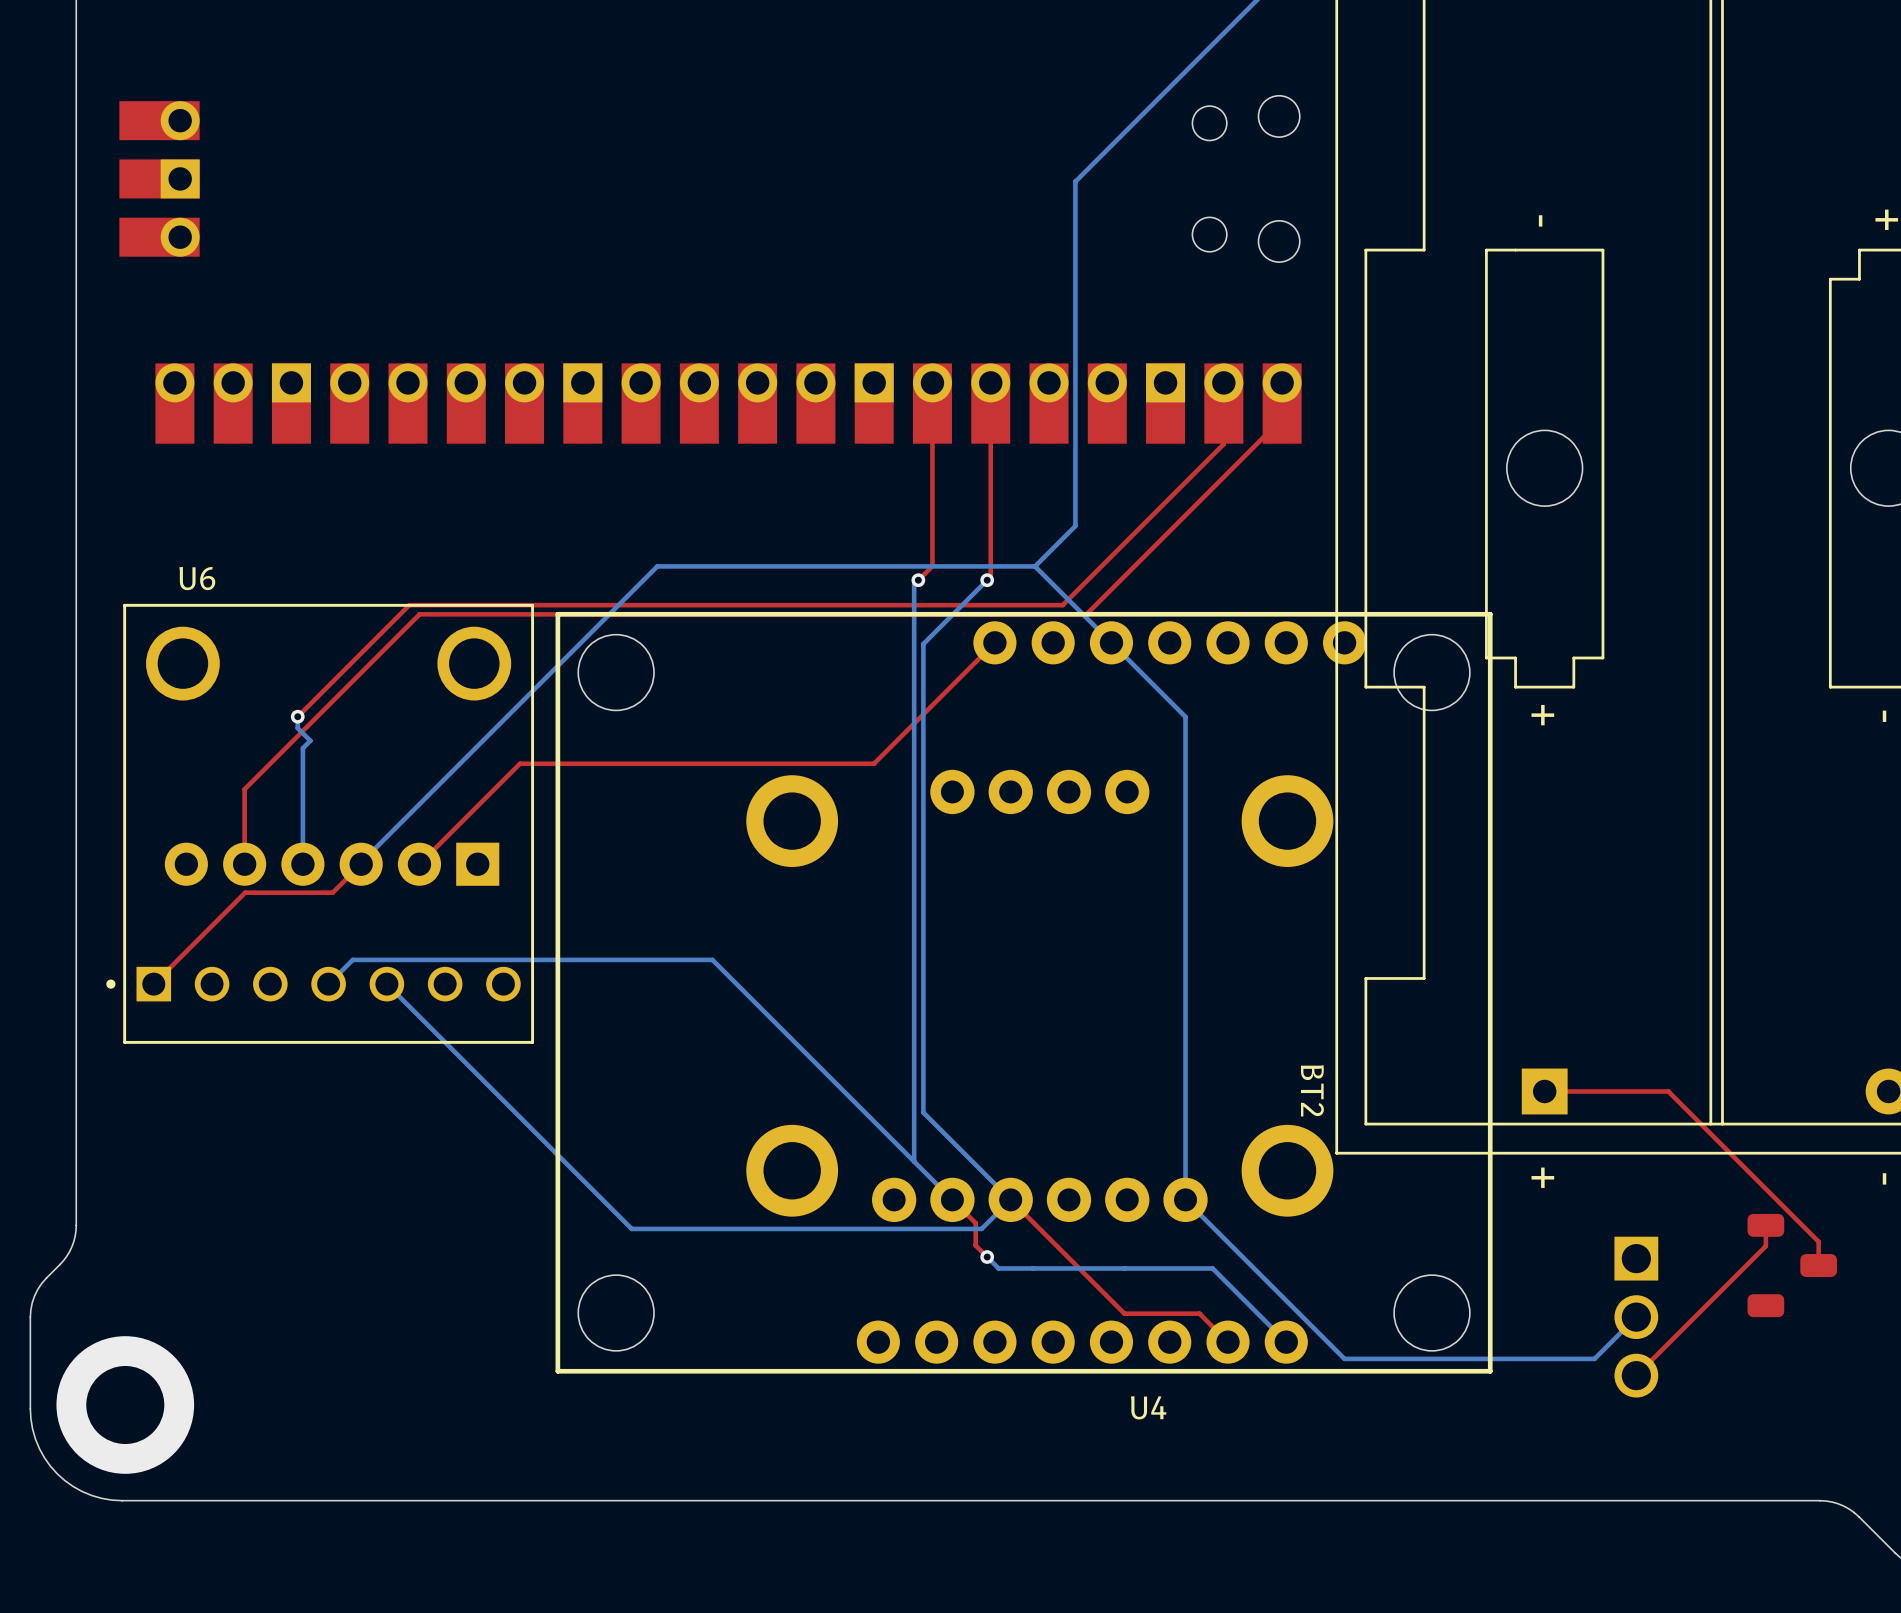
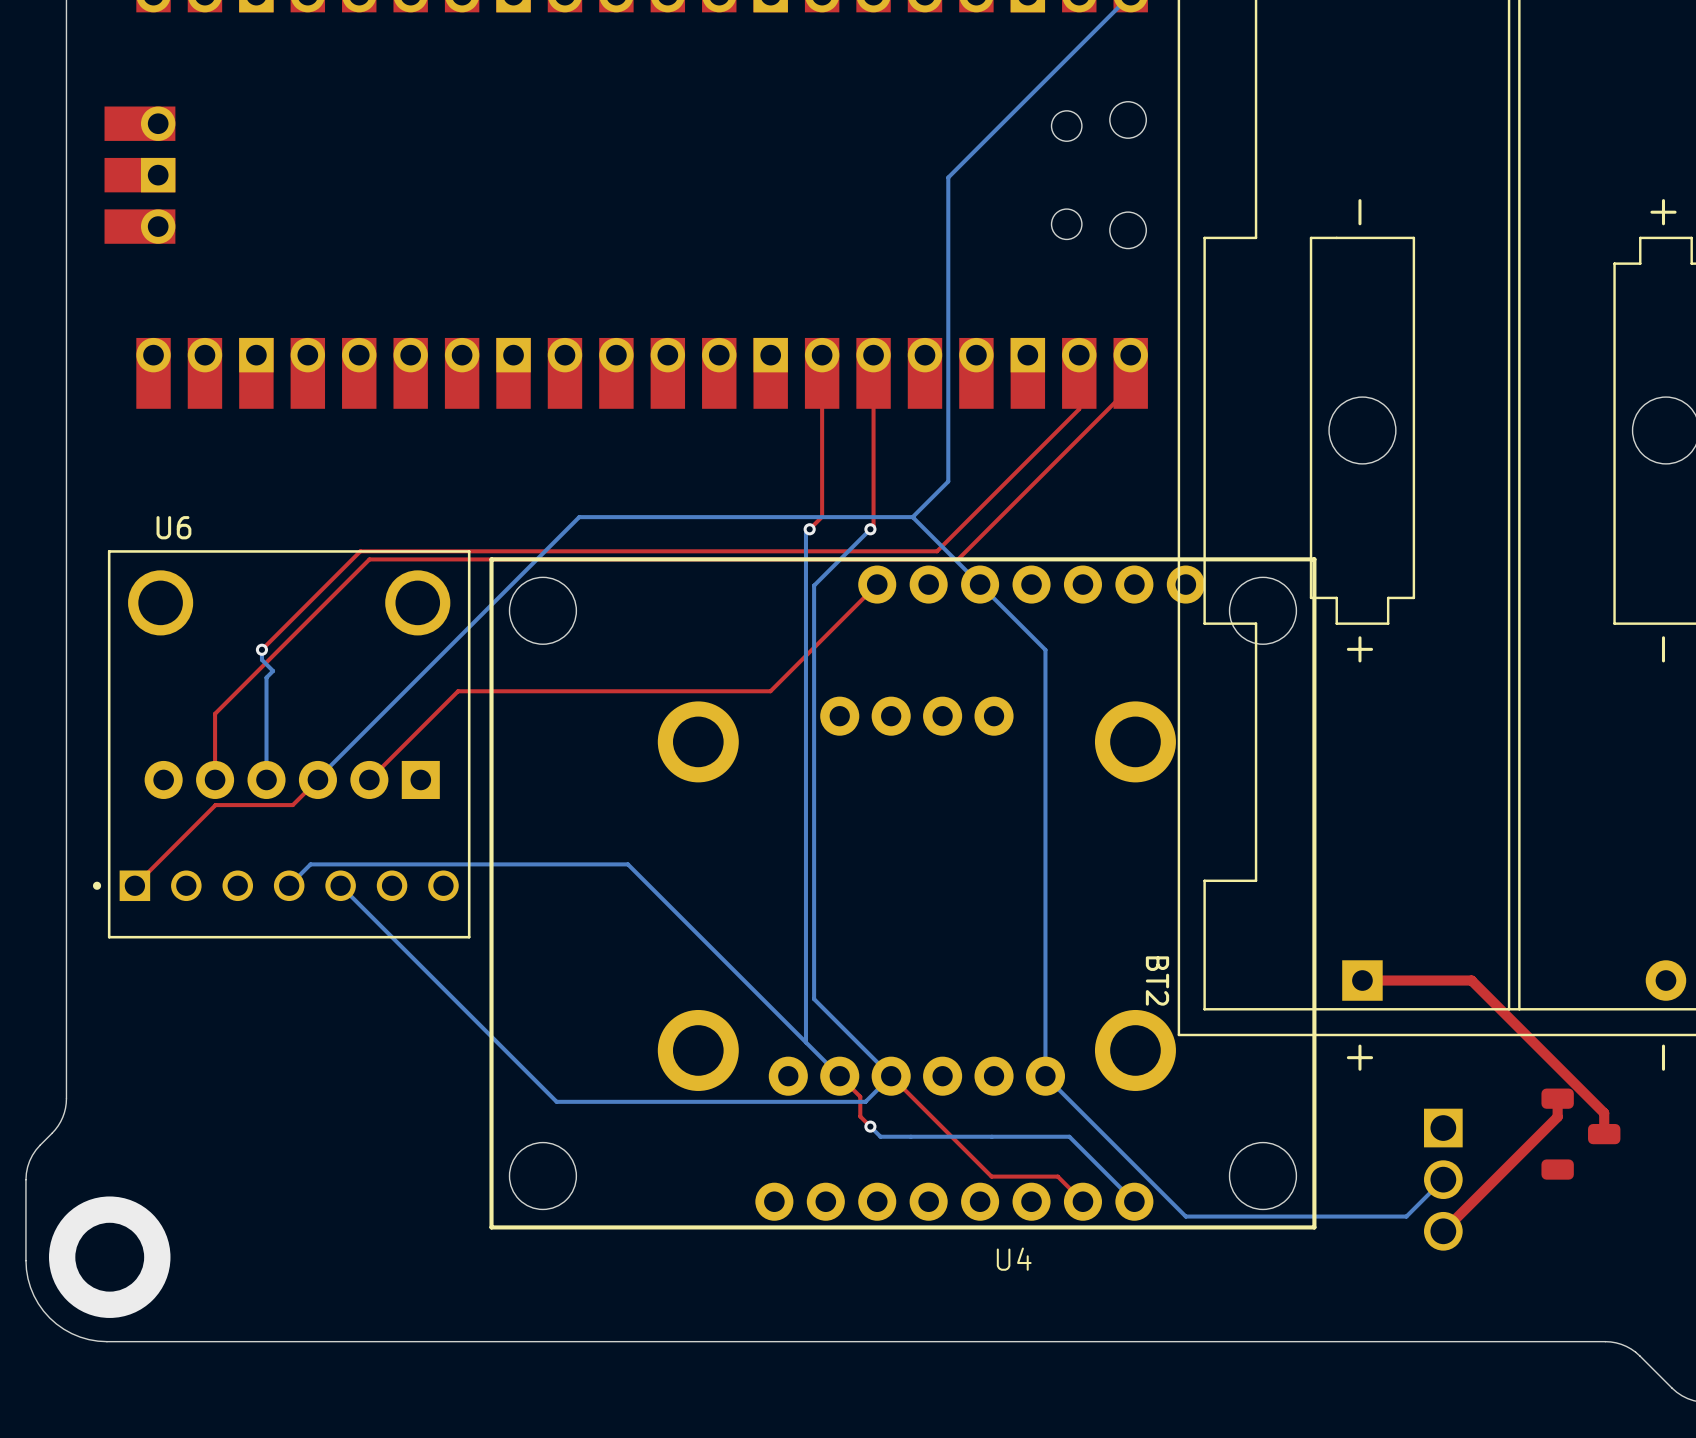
top track width: thin (1544, 1091) (1668, 1091) (1818, 1241) (1818, 1265) -> thick (1362, 980) (1471, 980) (1604, 1113) (1604, 1134)
top track width: thin (1765, 1225) (1765, 1246) (1636, 1375) -> thick (1557, 1098) (1557, 1116) (1443, 1231)

